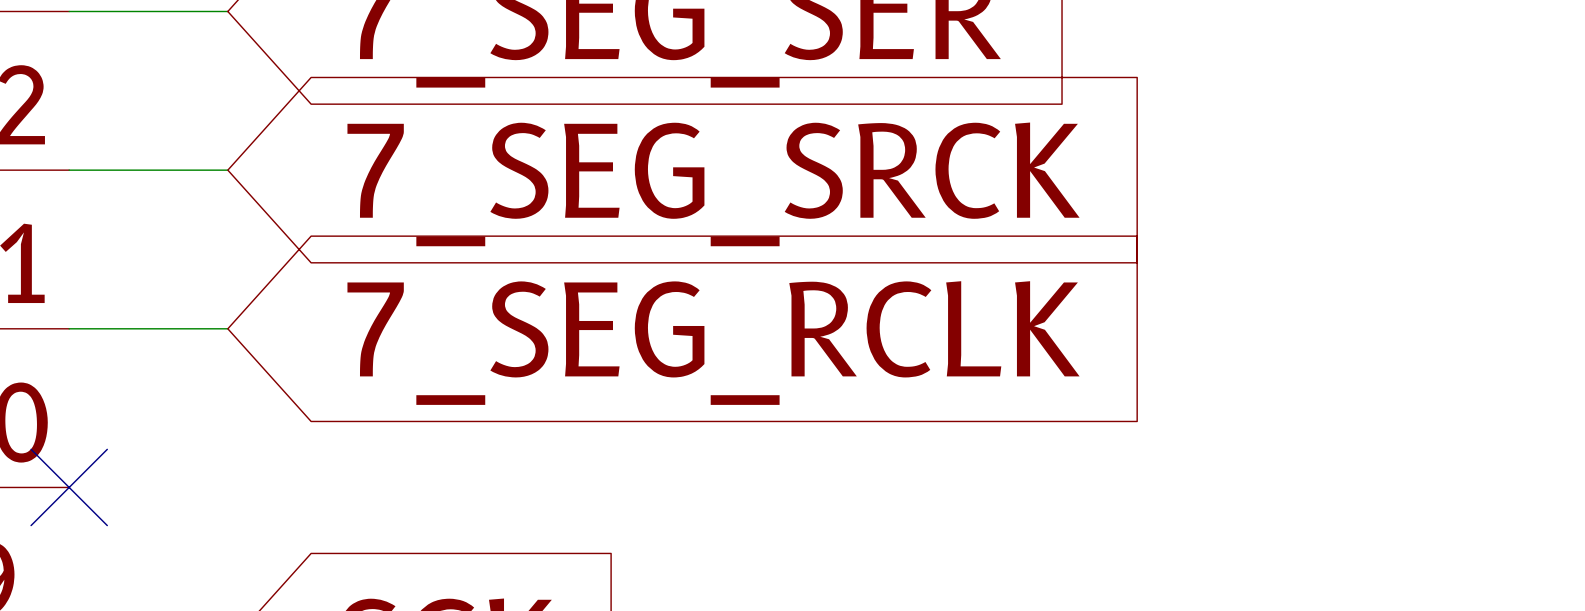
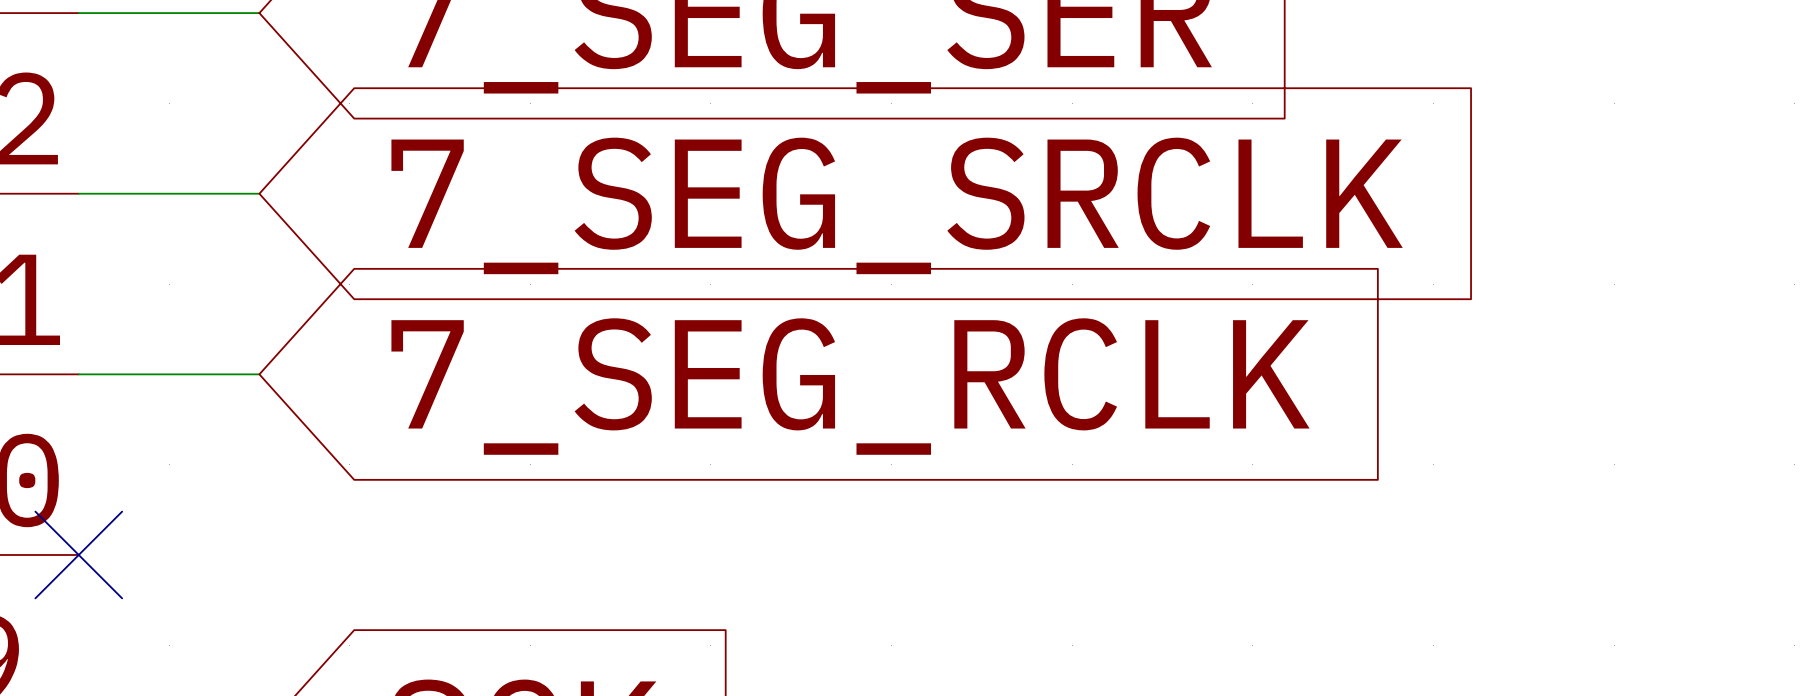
global label: 7_SEG_SRCK (713, 184) -> 7_SEG_SRCLK (897, 205)

